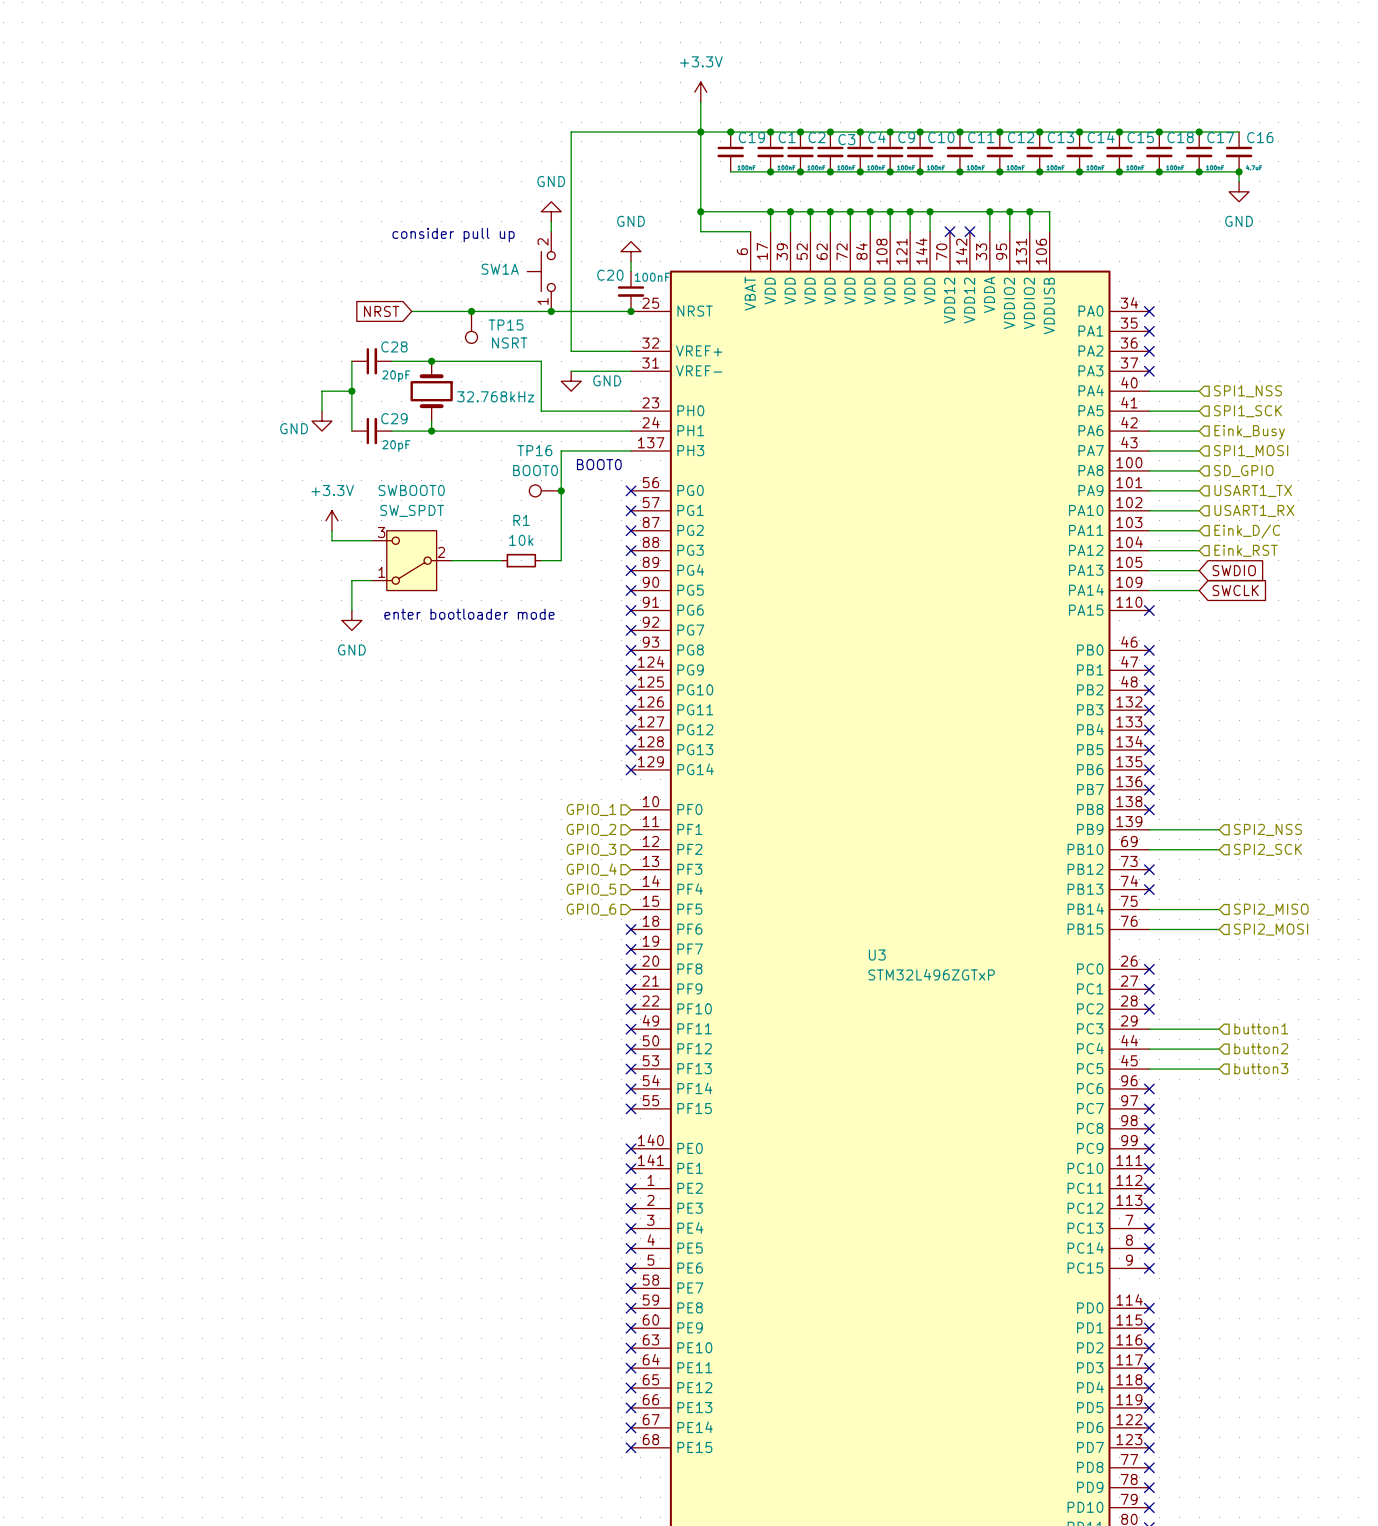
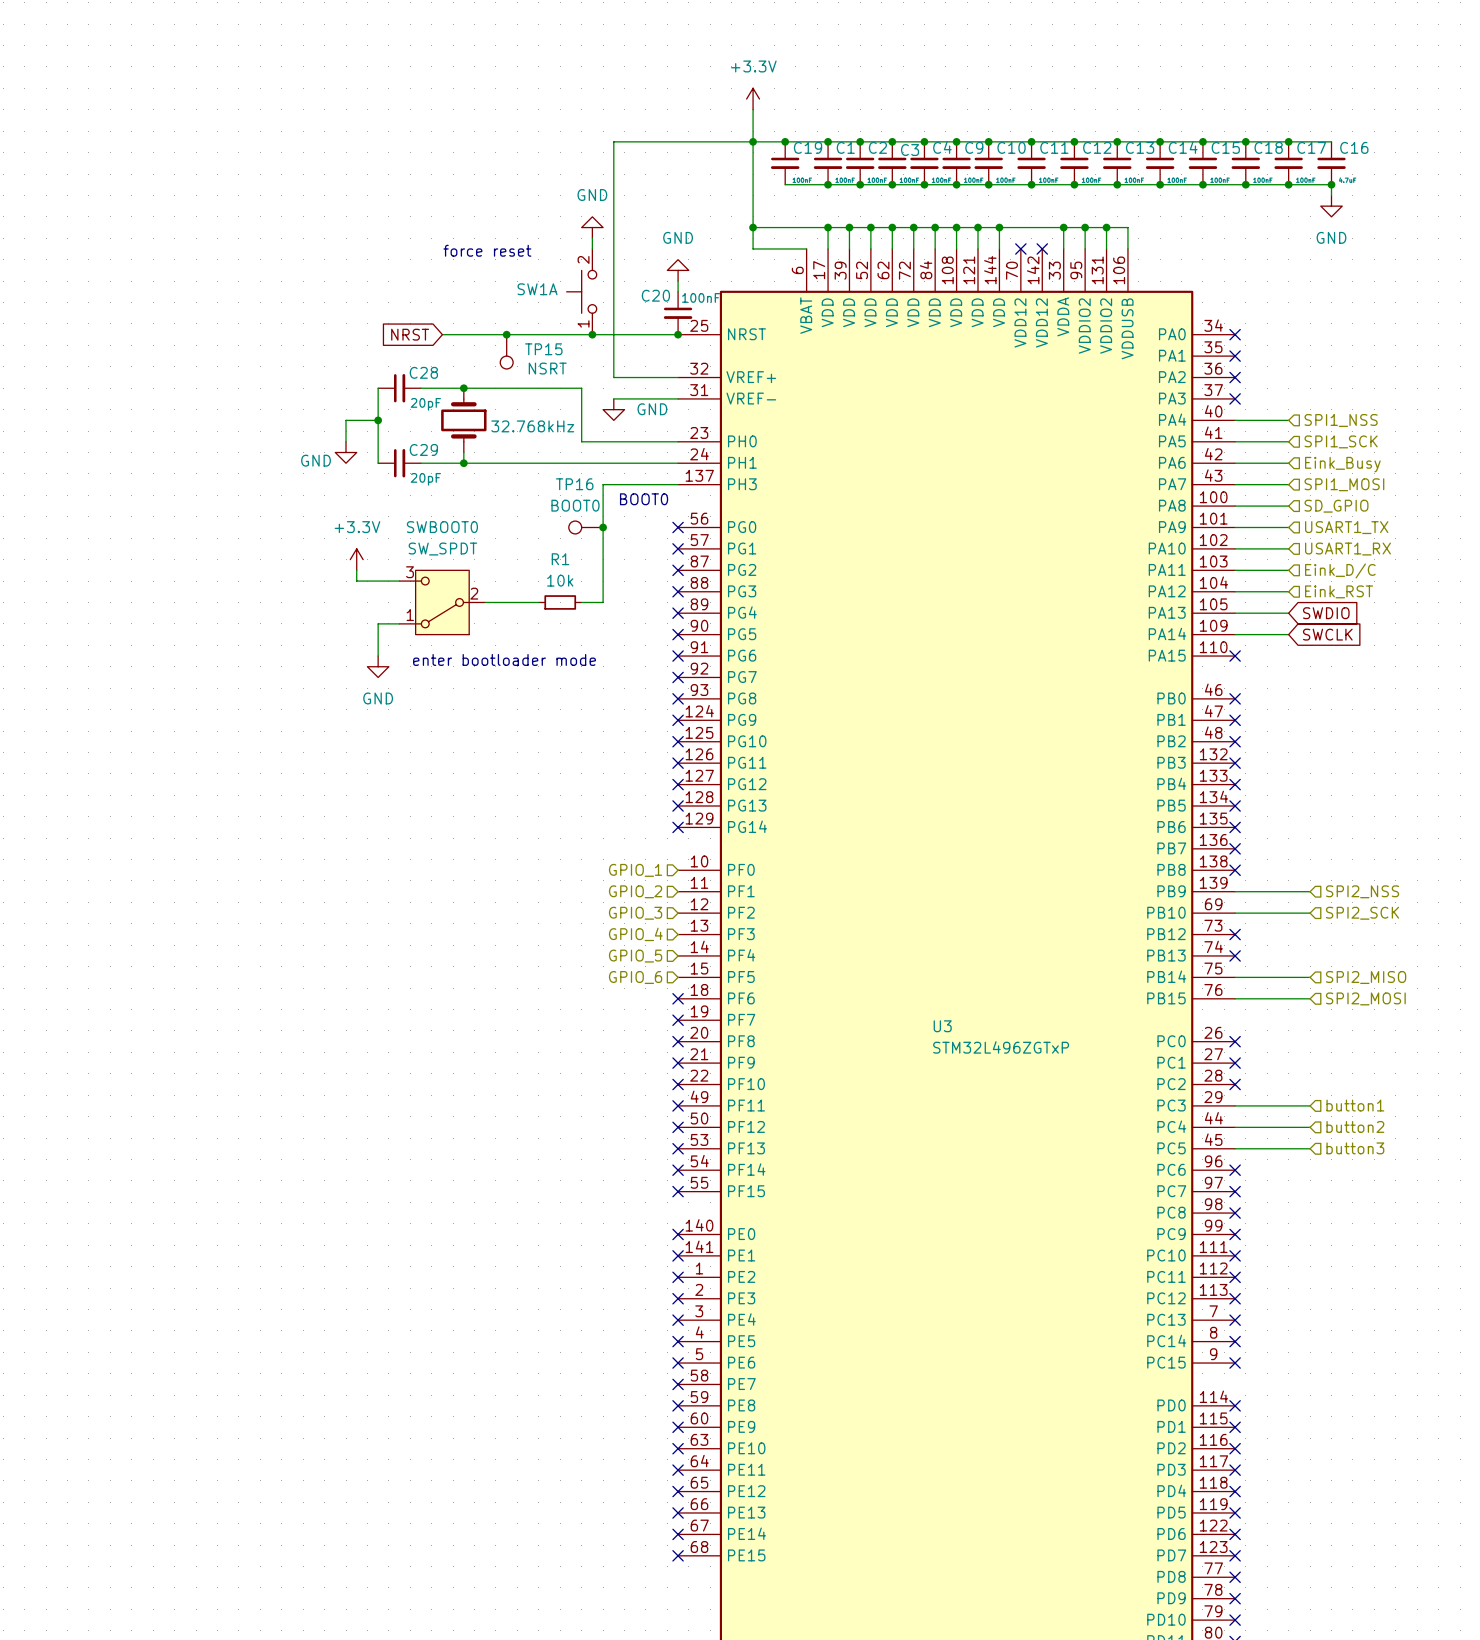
text: consider pull up (453, 235) -> force reset (487, 250)

